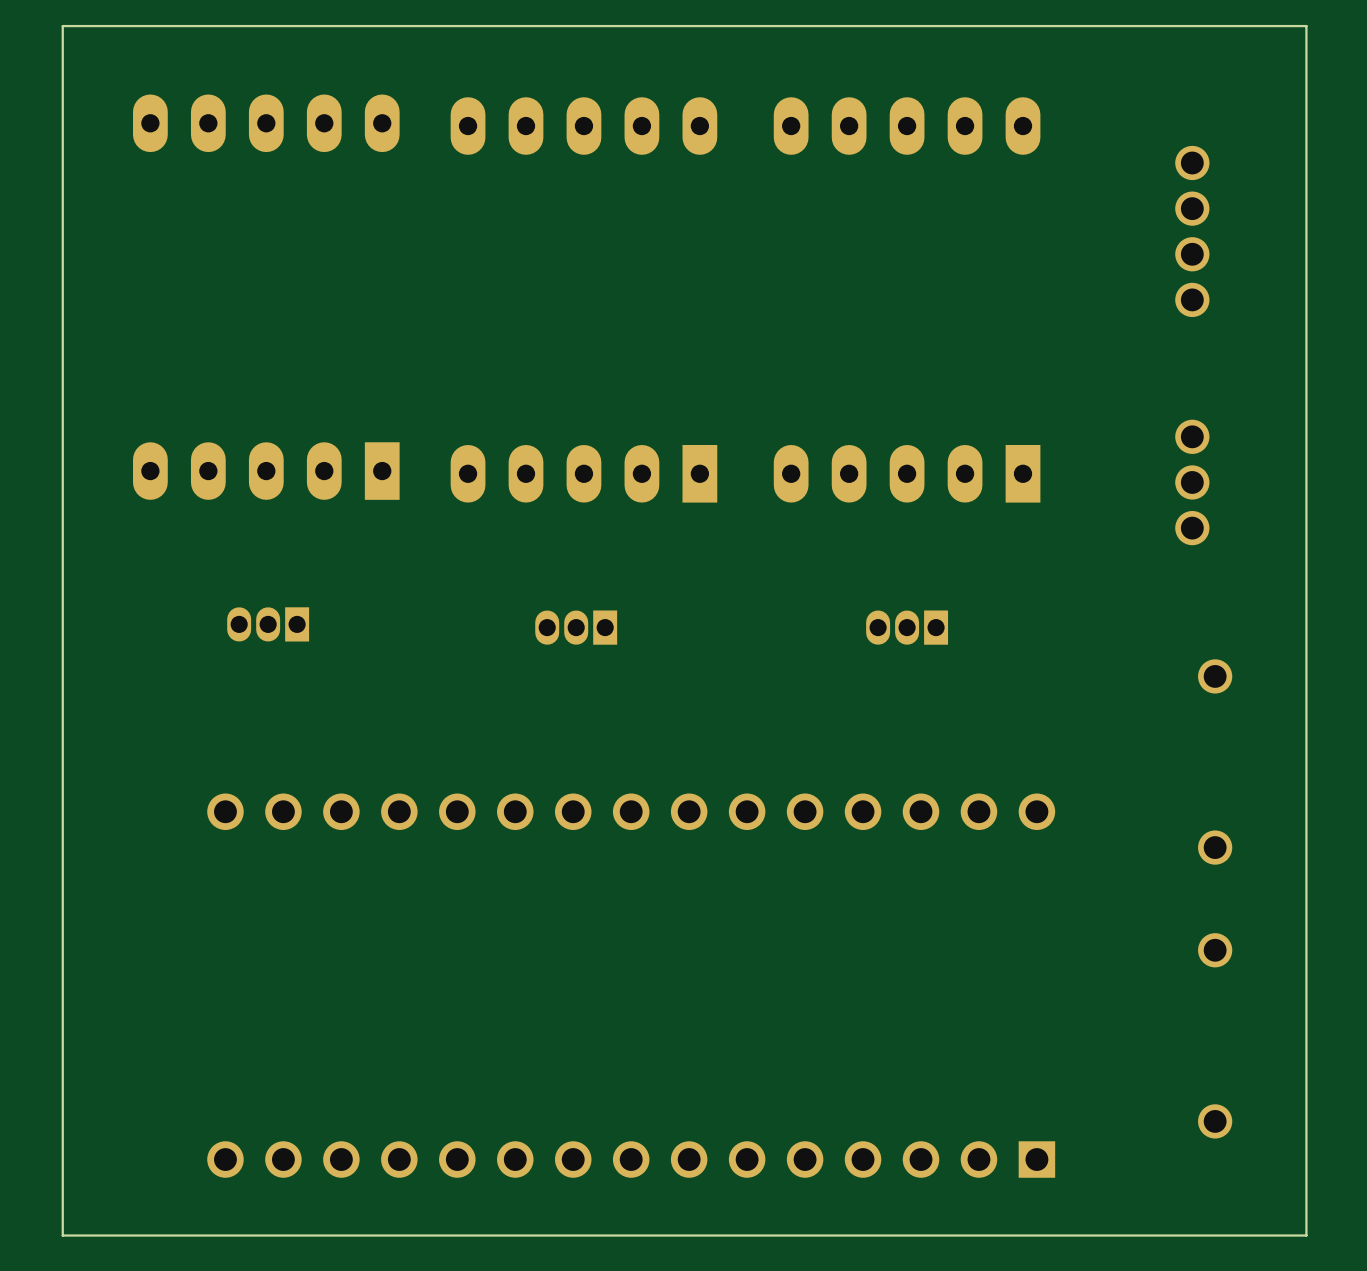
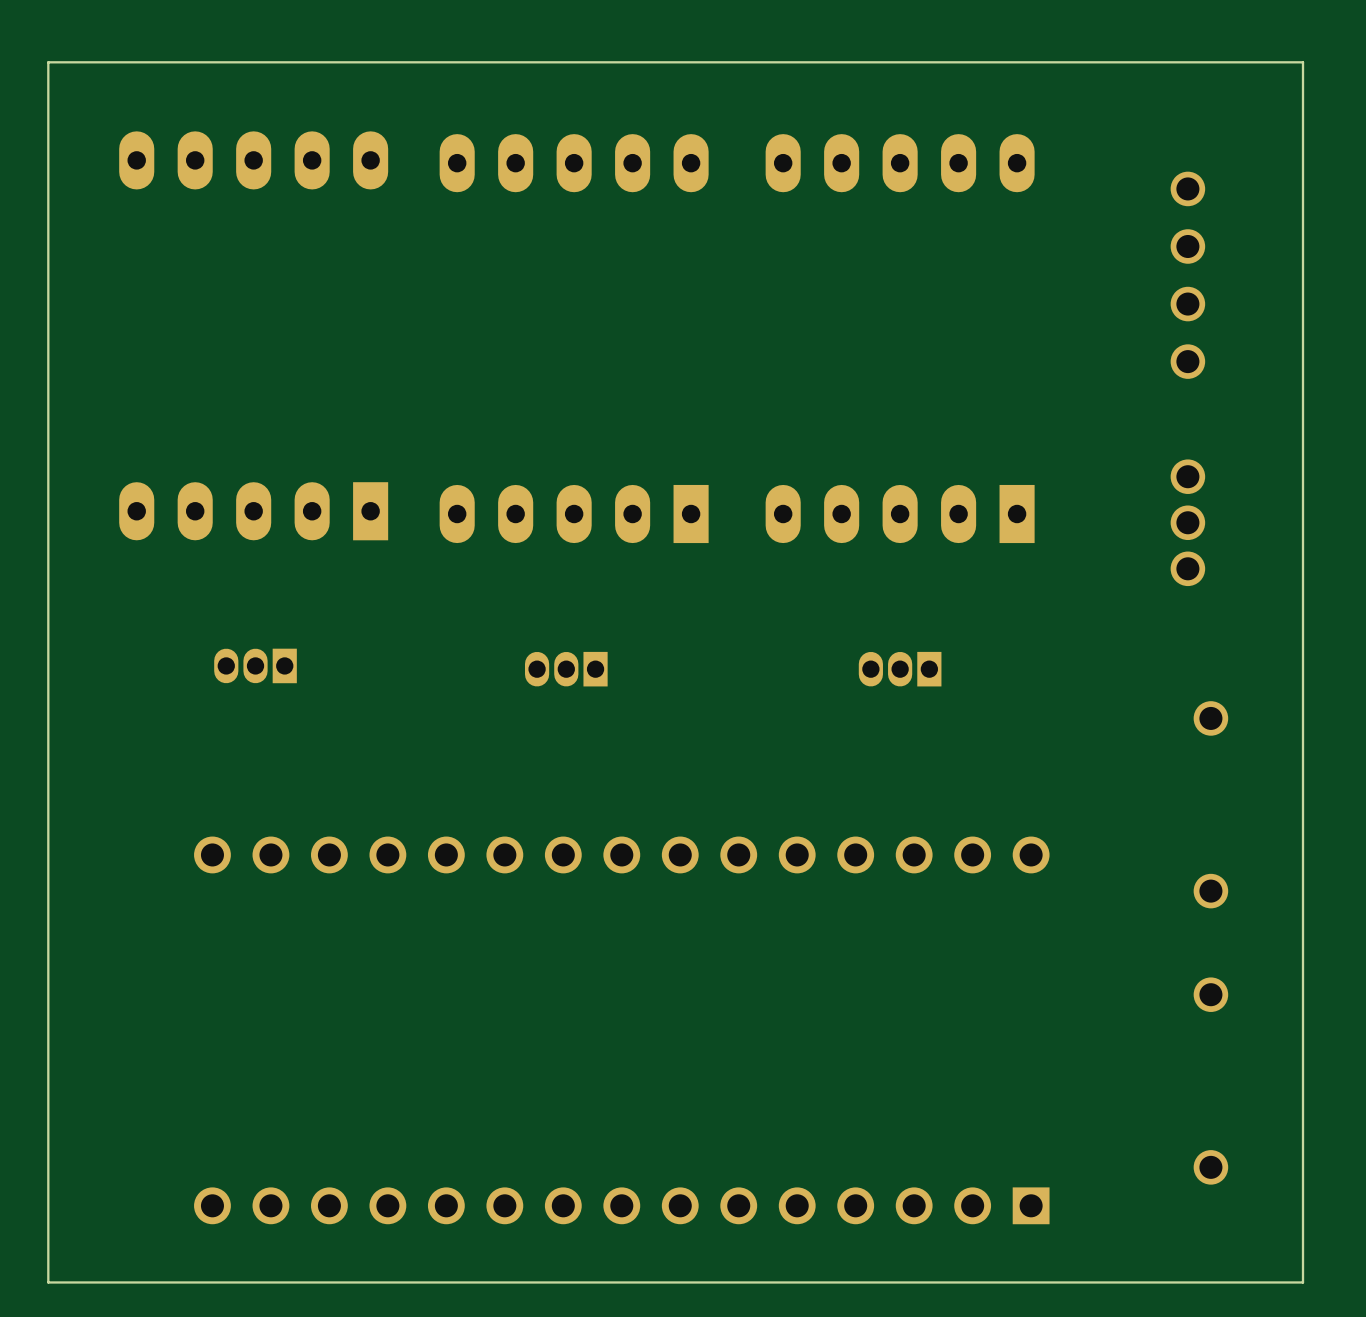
part footprint: [1175, 145, 1210, 318] -> [1170, 171, 1206, 379]

